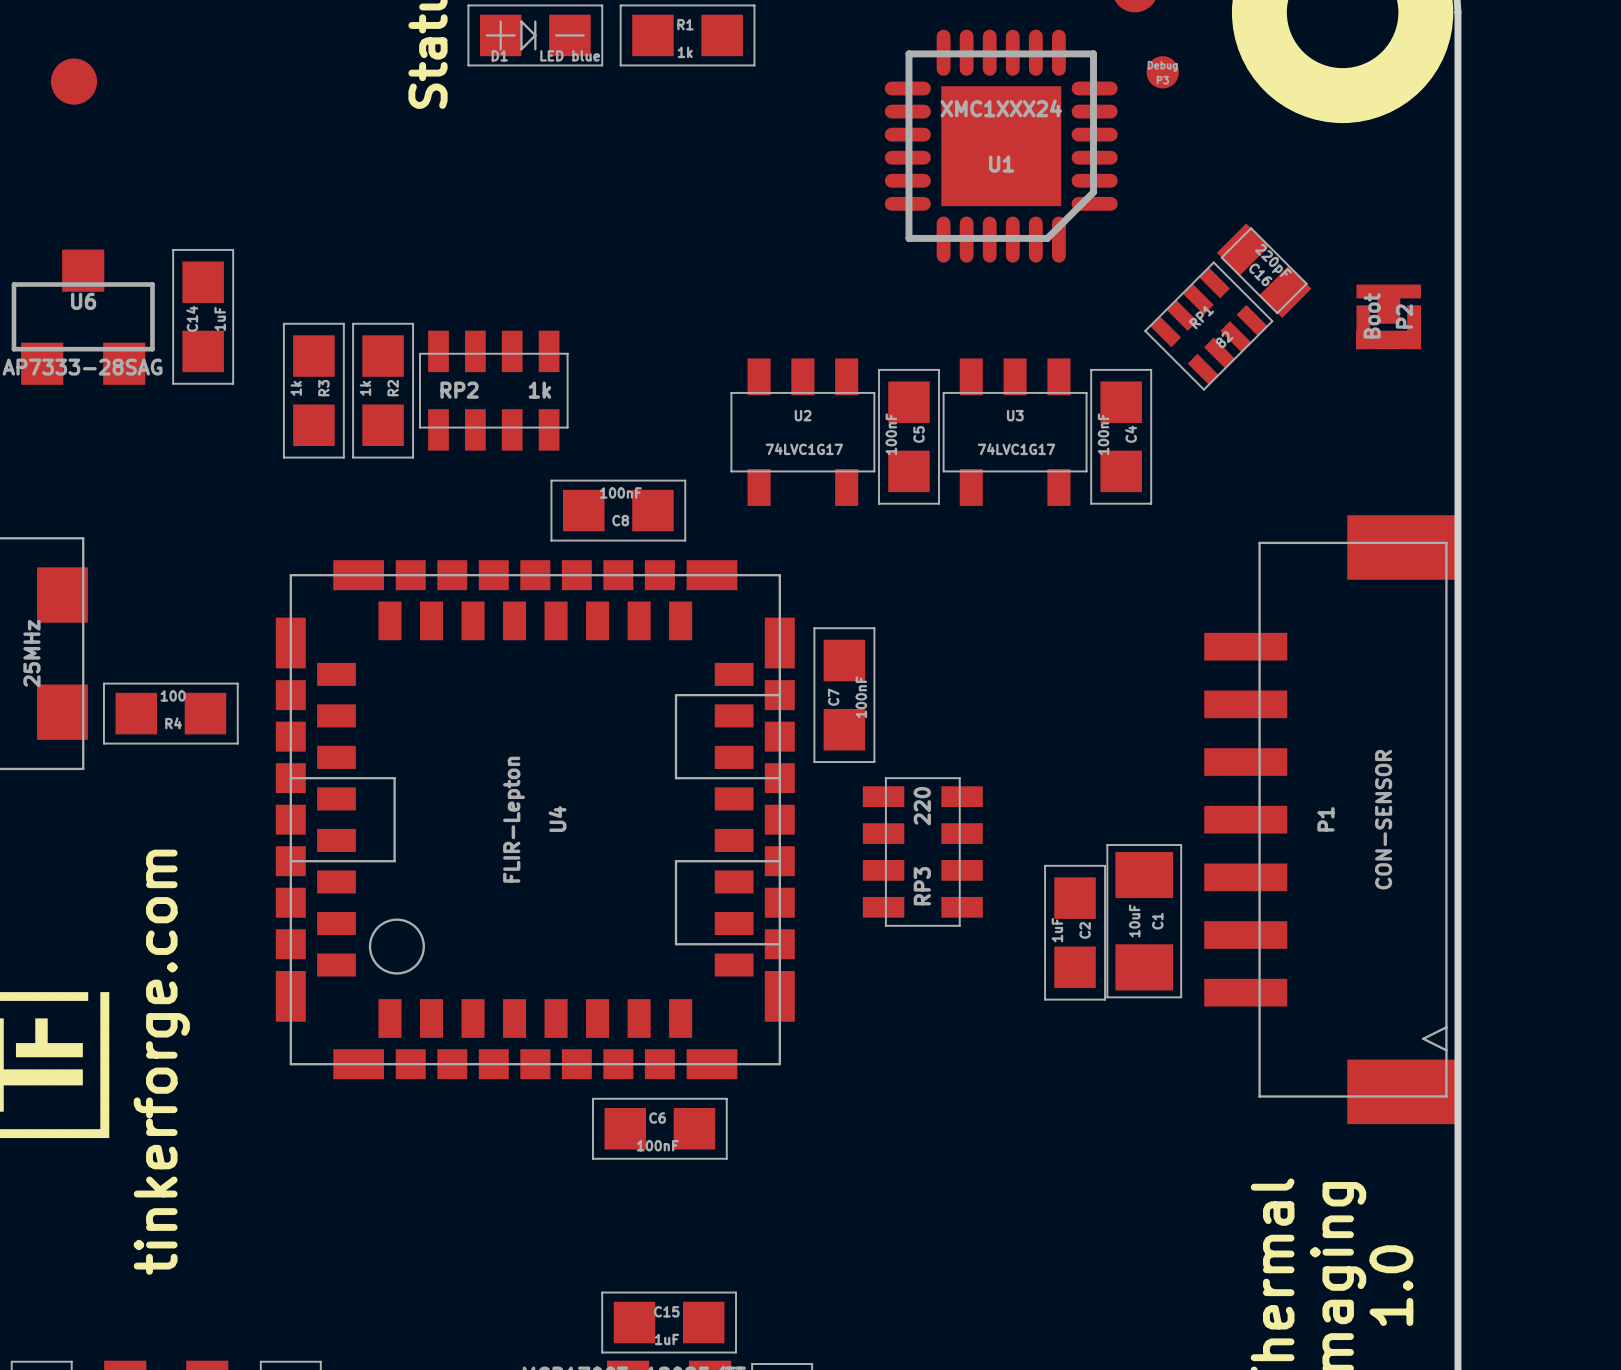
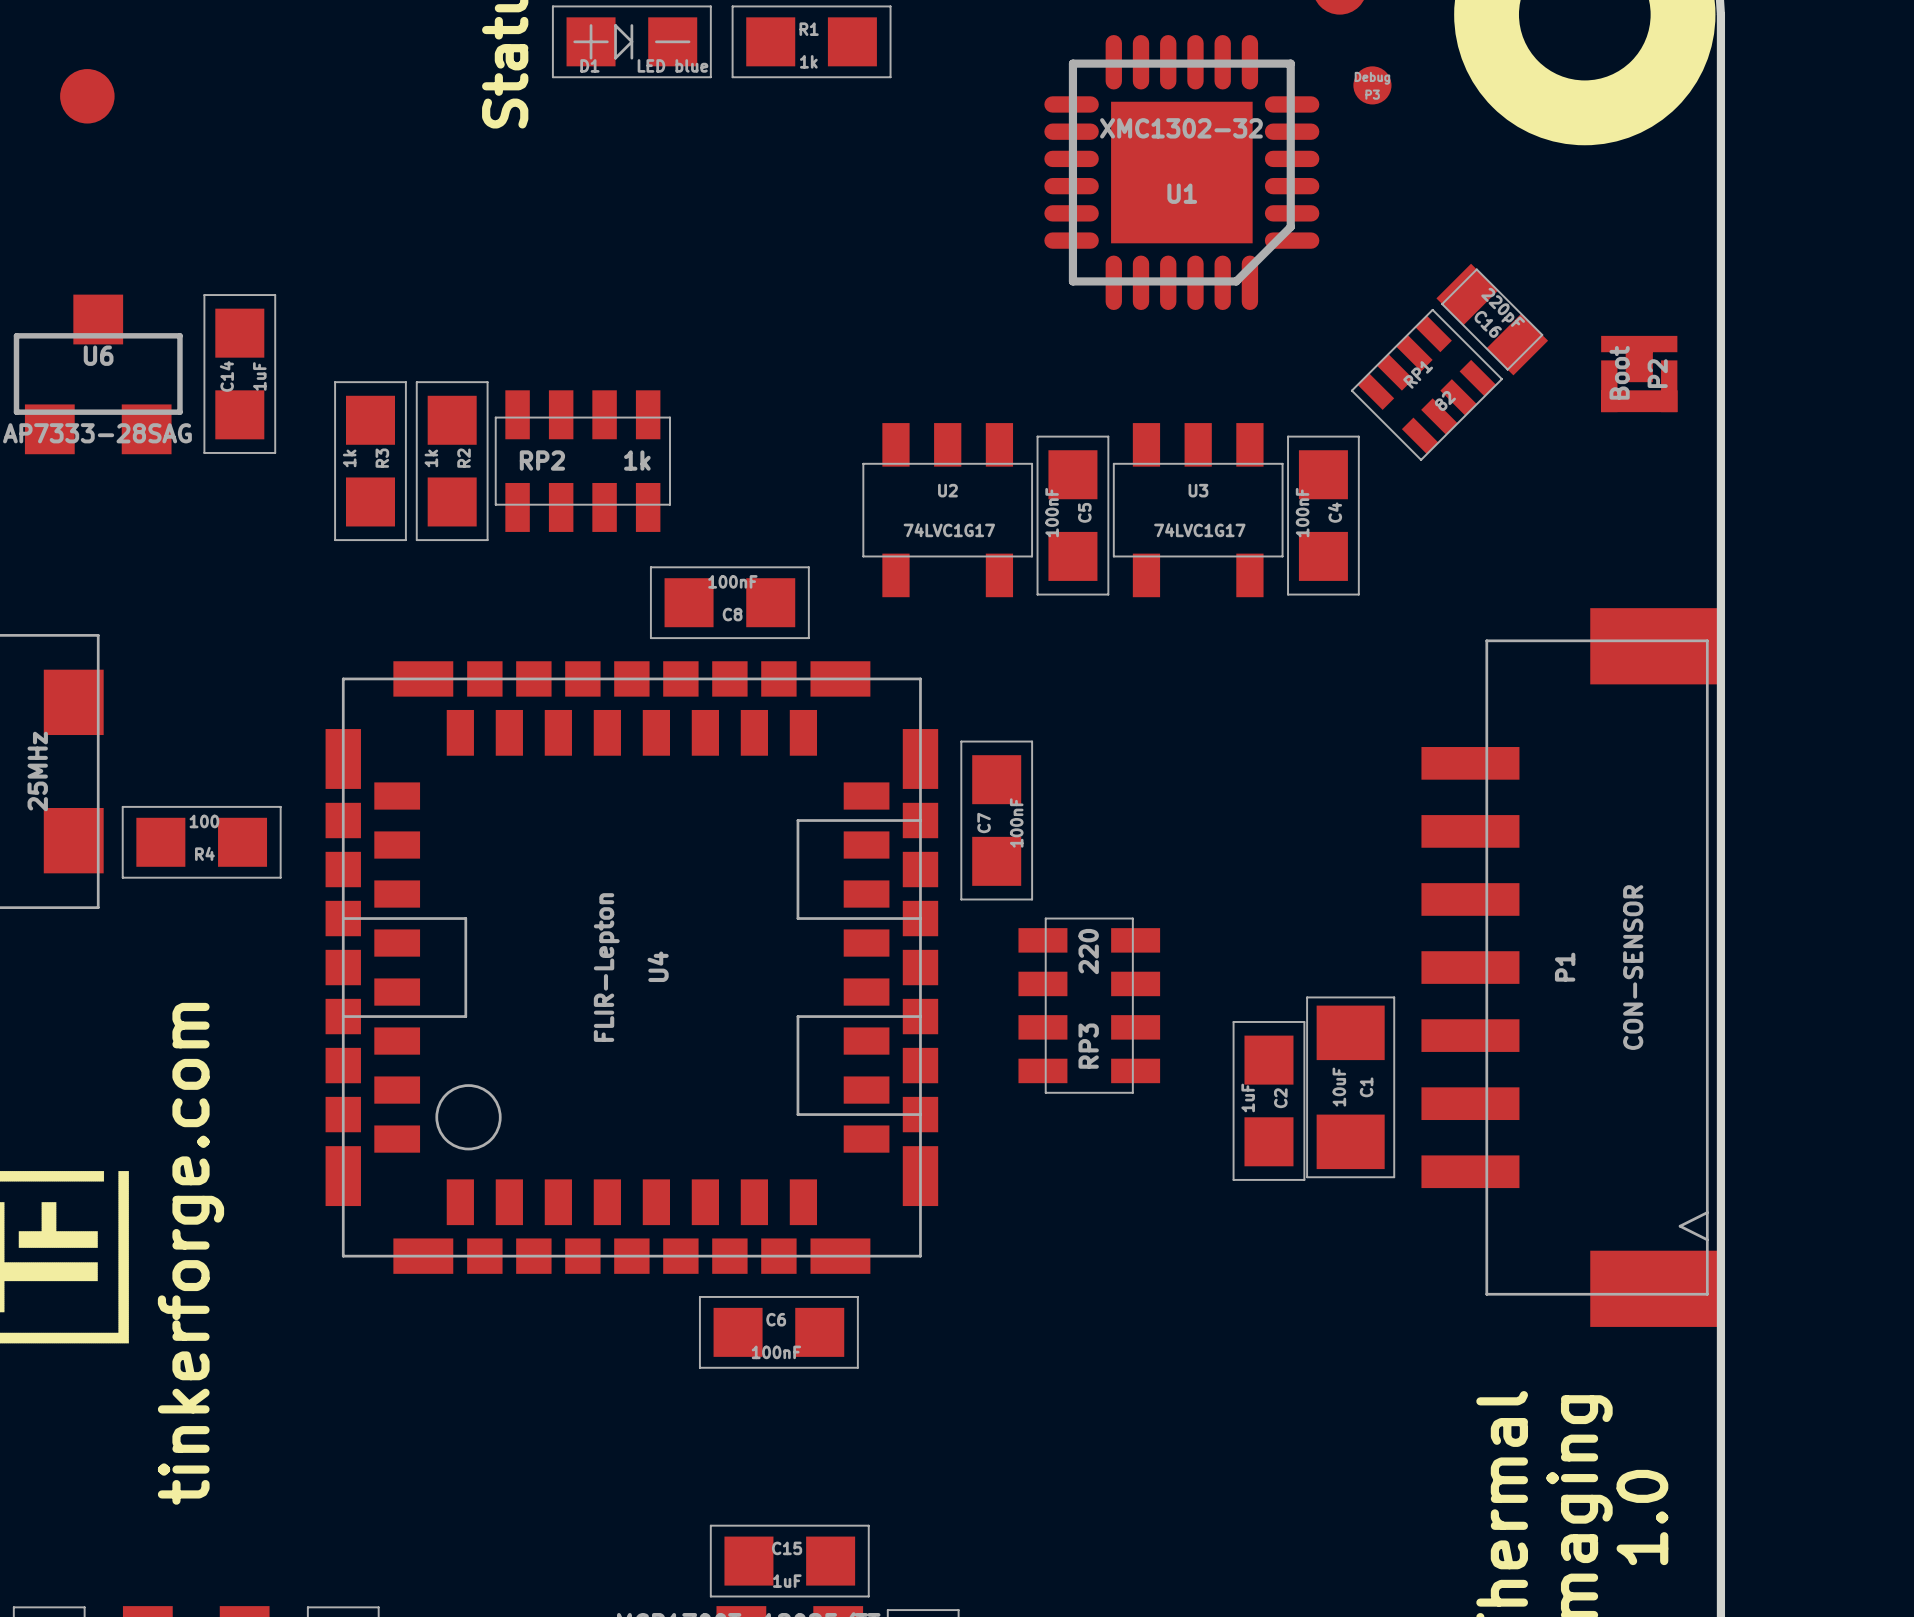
U1 value: XMC1XXX24 (1001, 108) -> XMC1302-32 (1181, 128)

